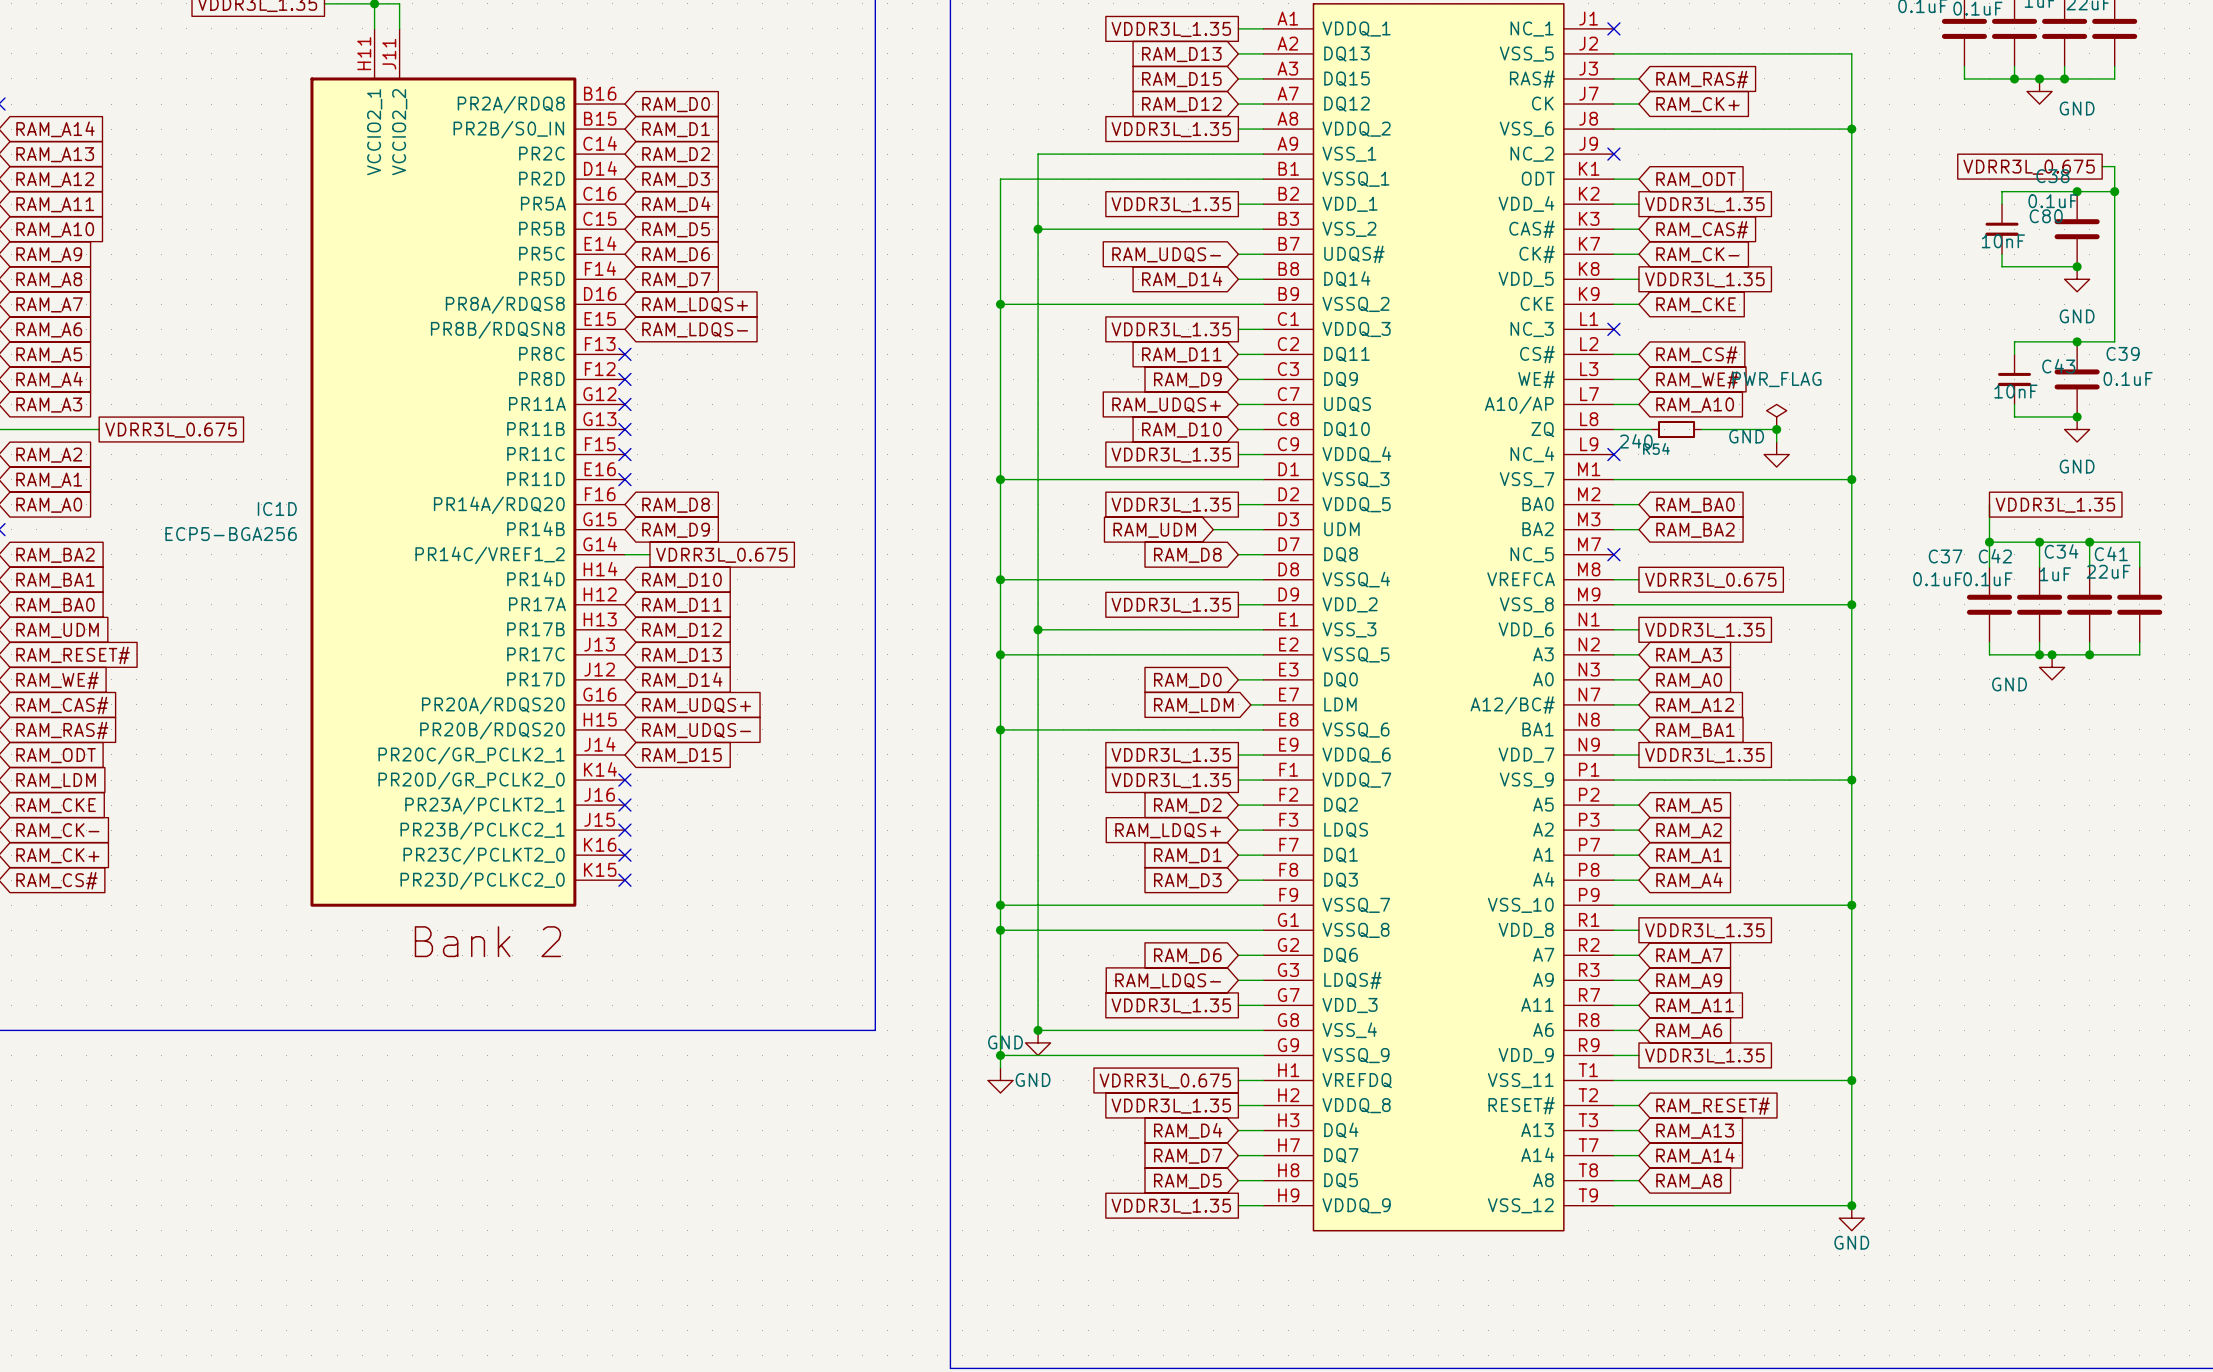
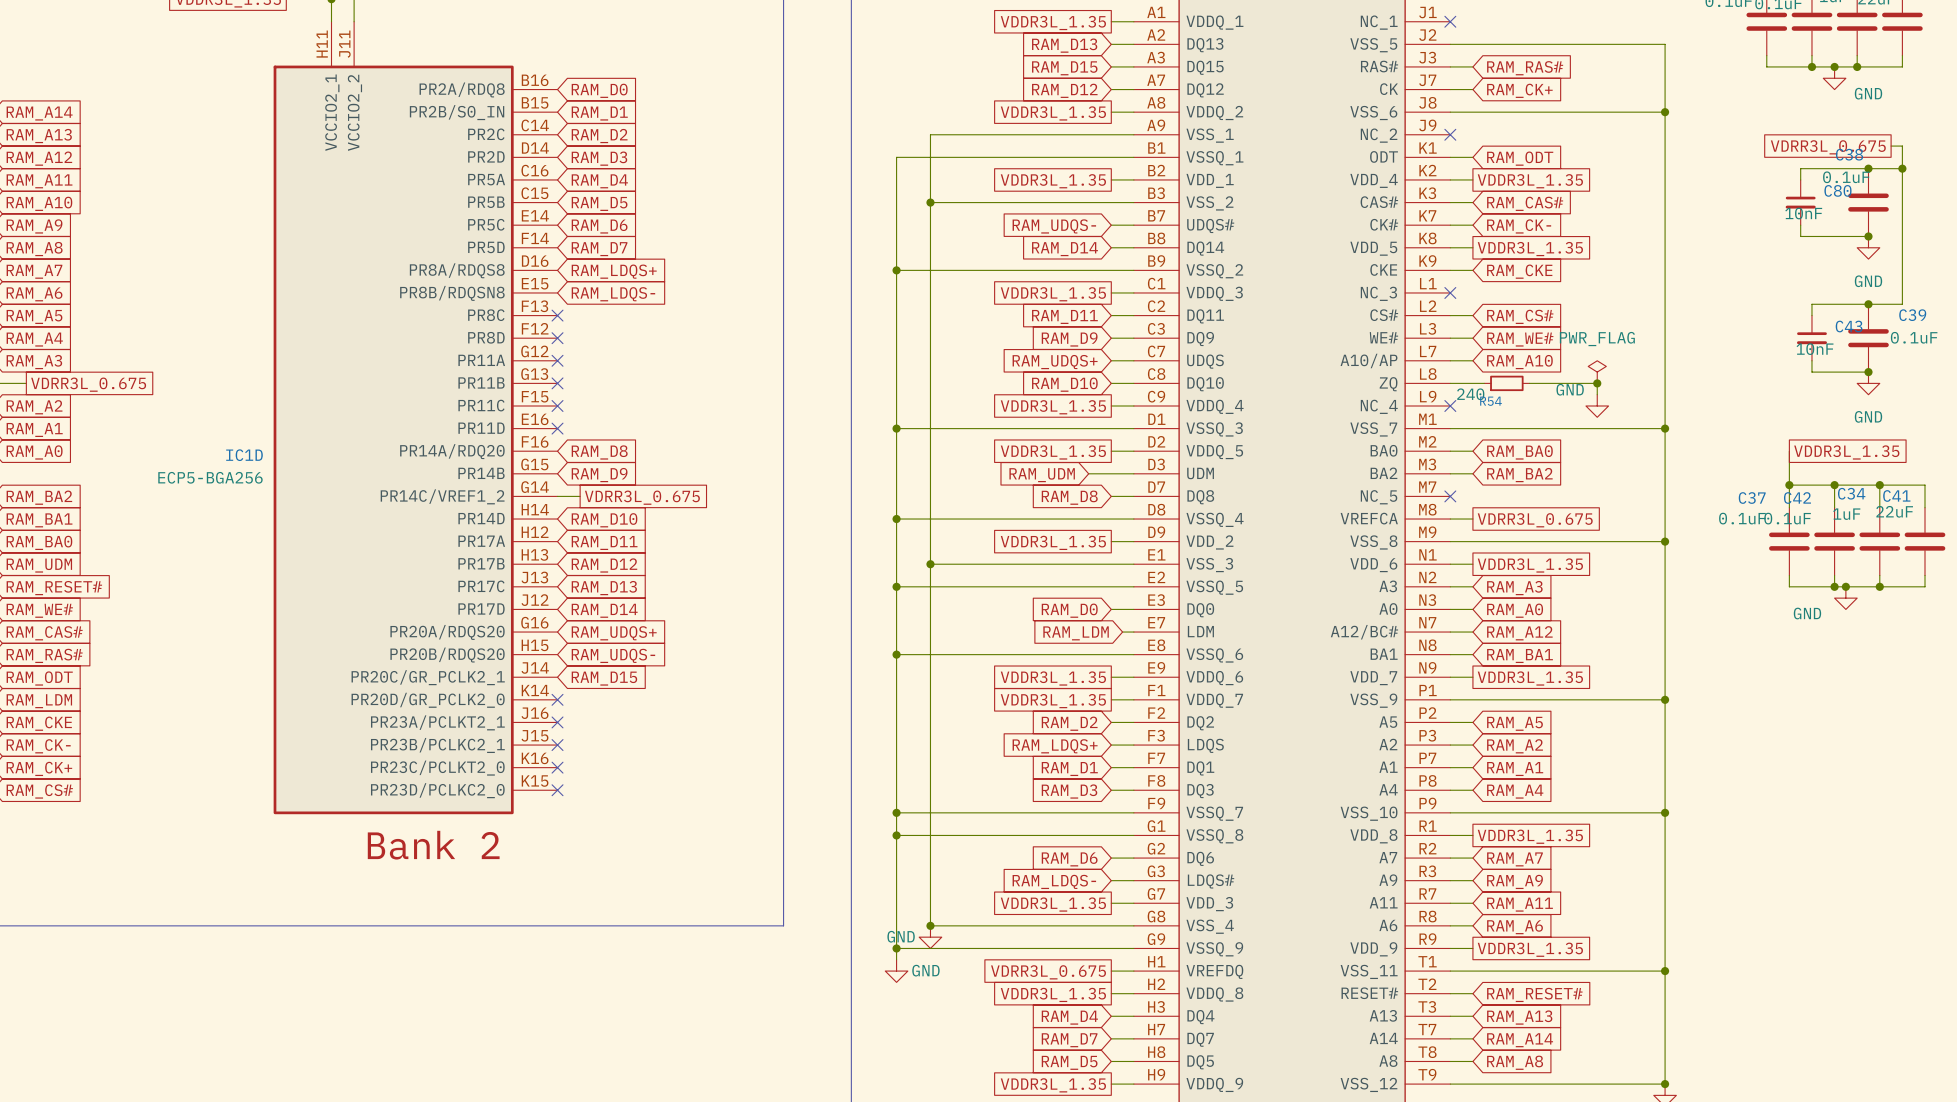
wire: (36, 429) (99, 429) -> none
global label position: VDRR3L_0.675 (170, 430) -> VDRR3L_0.675 (88, 384)

